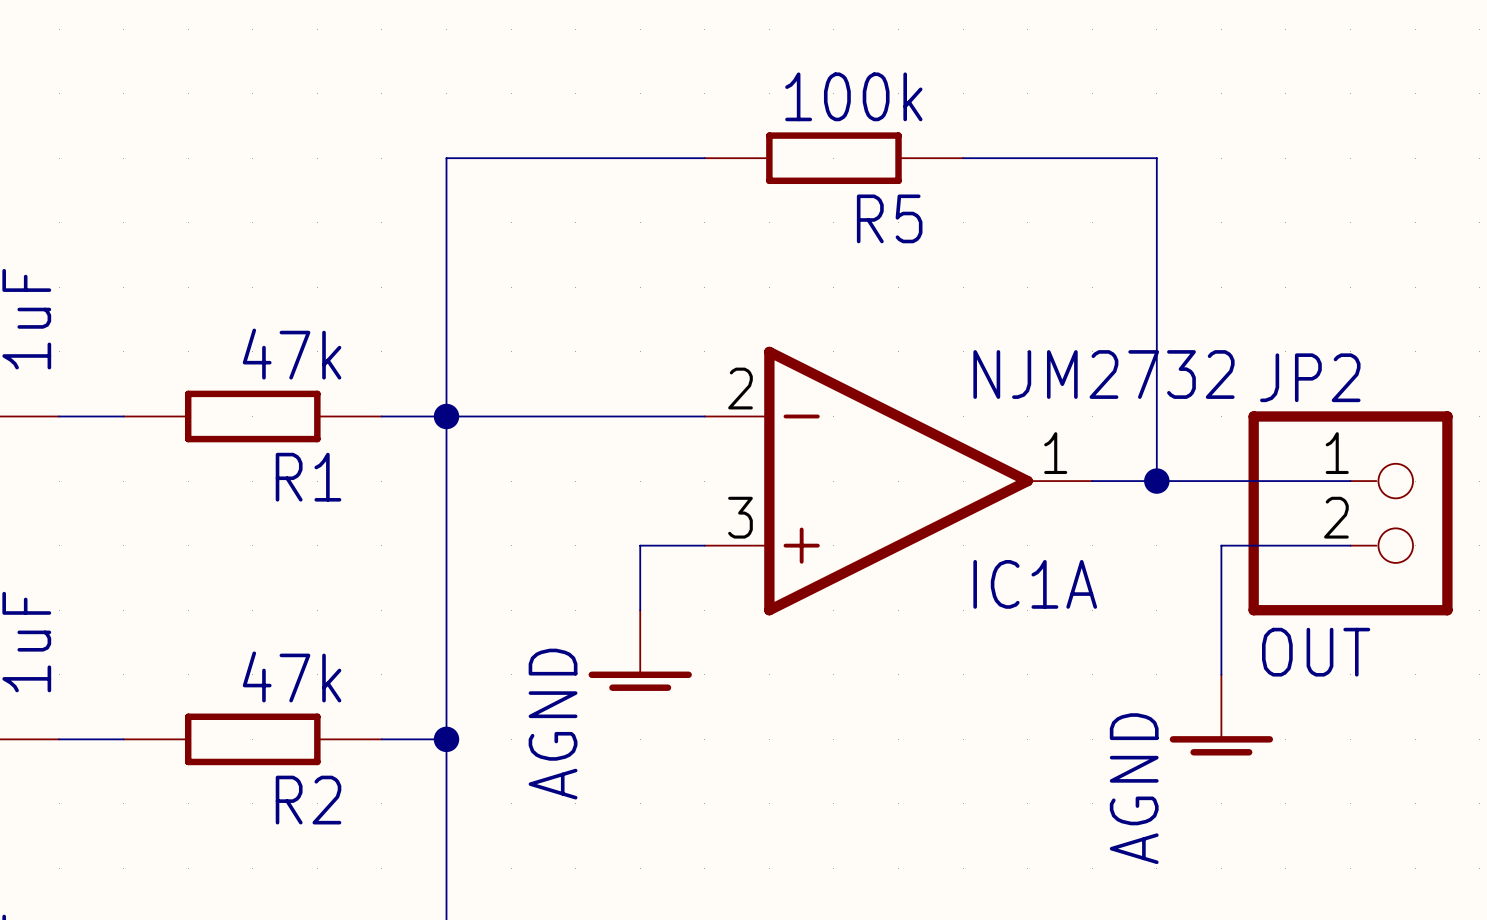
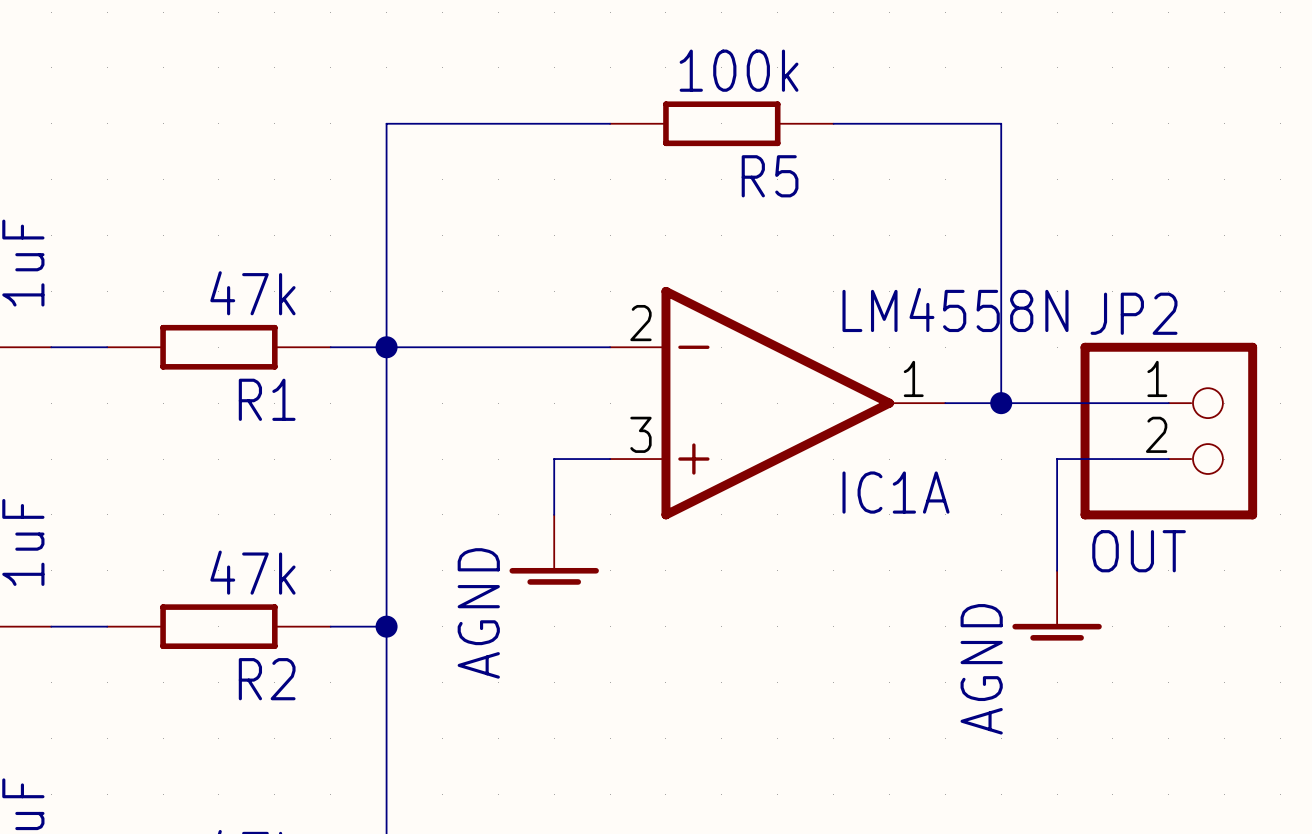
IC1A value: NJM2732 (1103, 374) -> LM4558N (955, 310)

